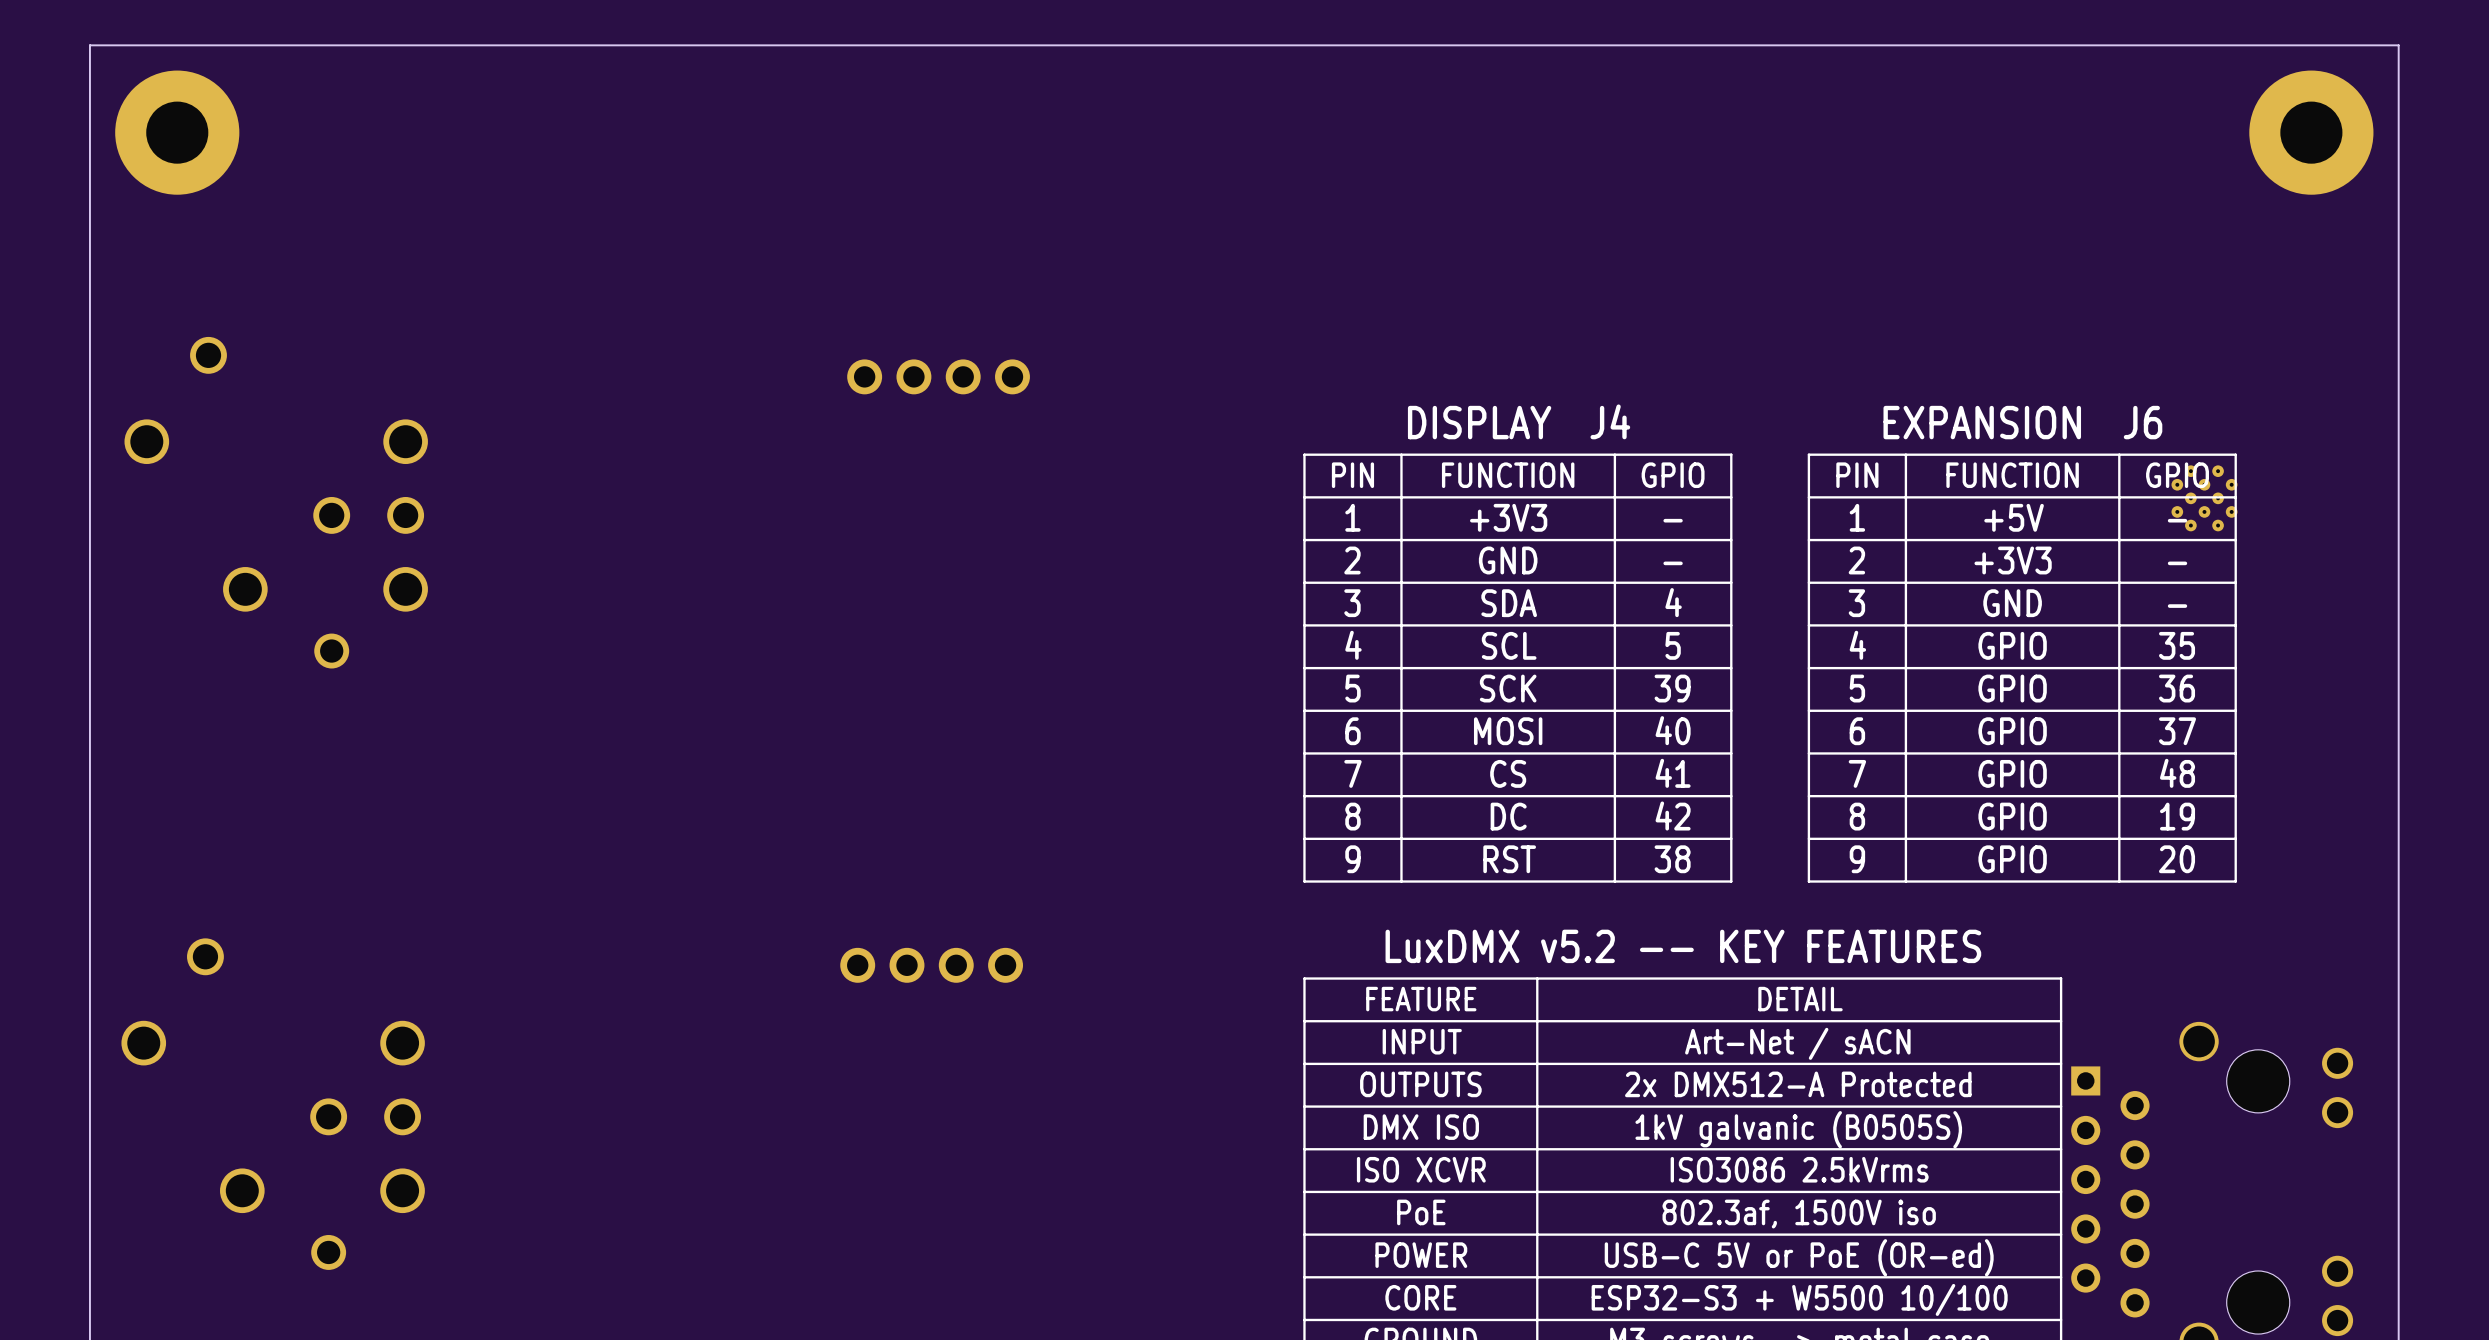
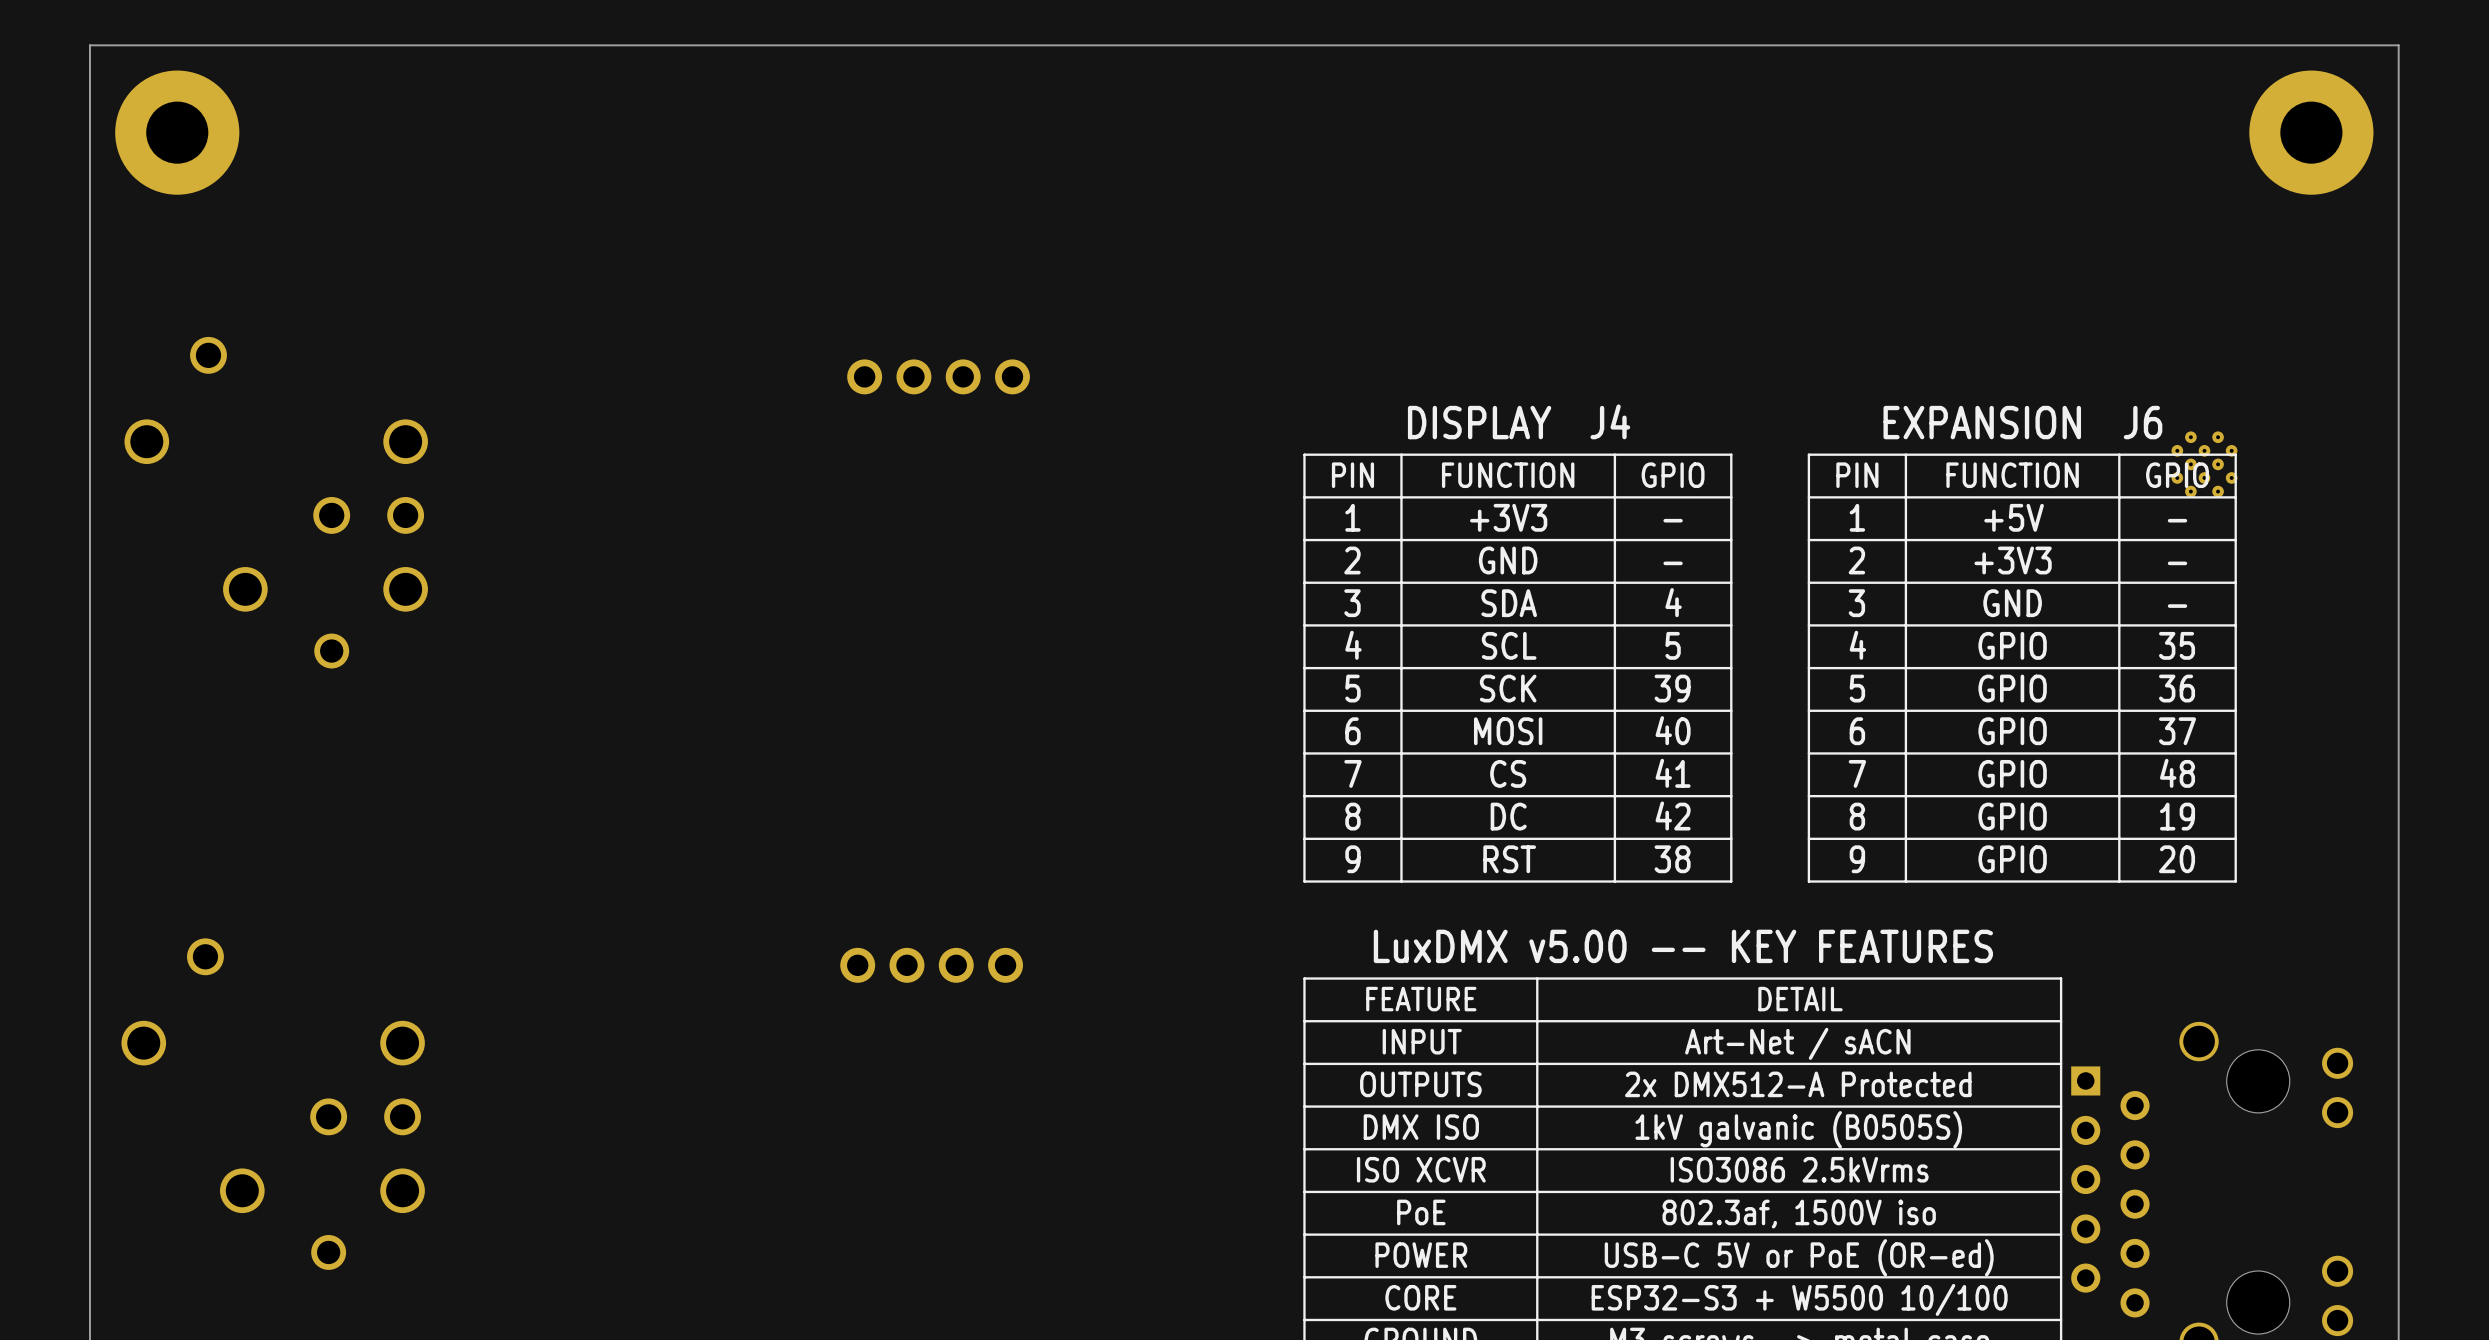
part position: (2204, 498) -> (2204, 464)
text: LuxDMX v5.2 -- KEY FEATURES (1683, 946) -> LuxDMX v5.00 -- KEY FEATURES (1683, 946)

